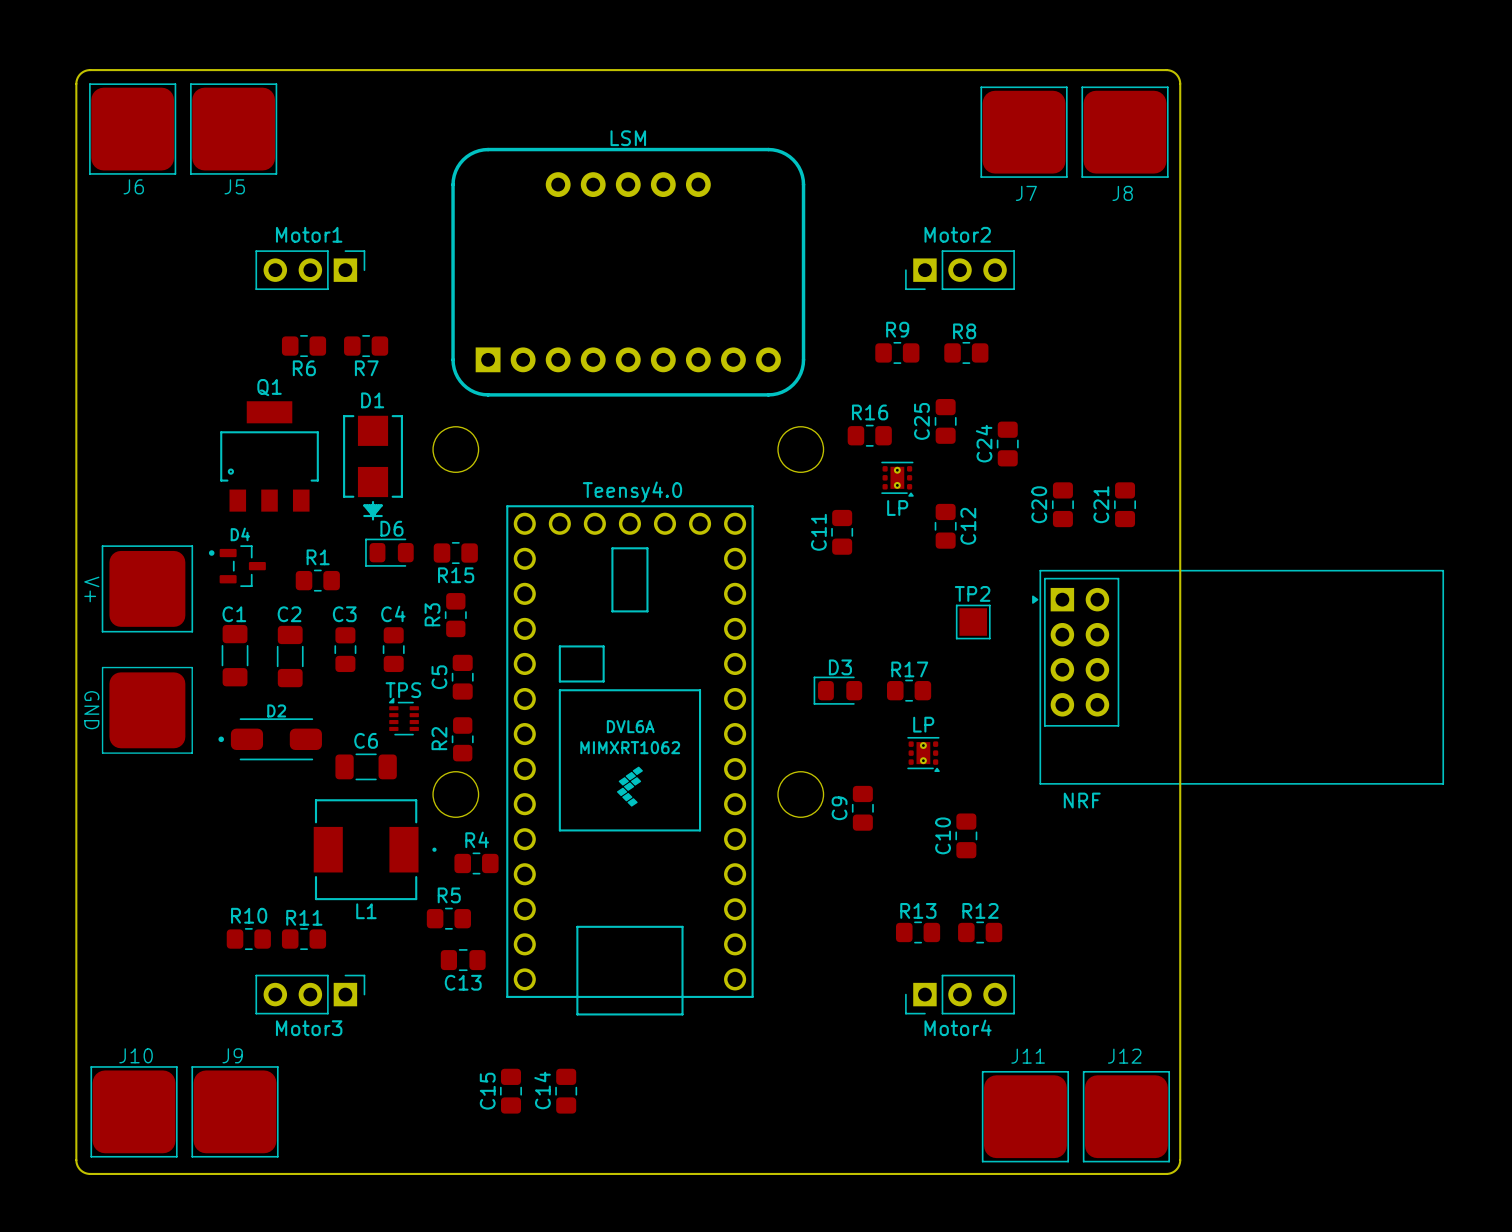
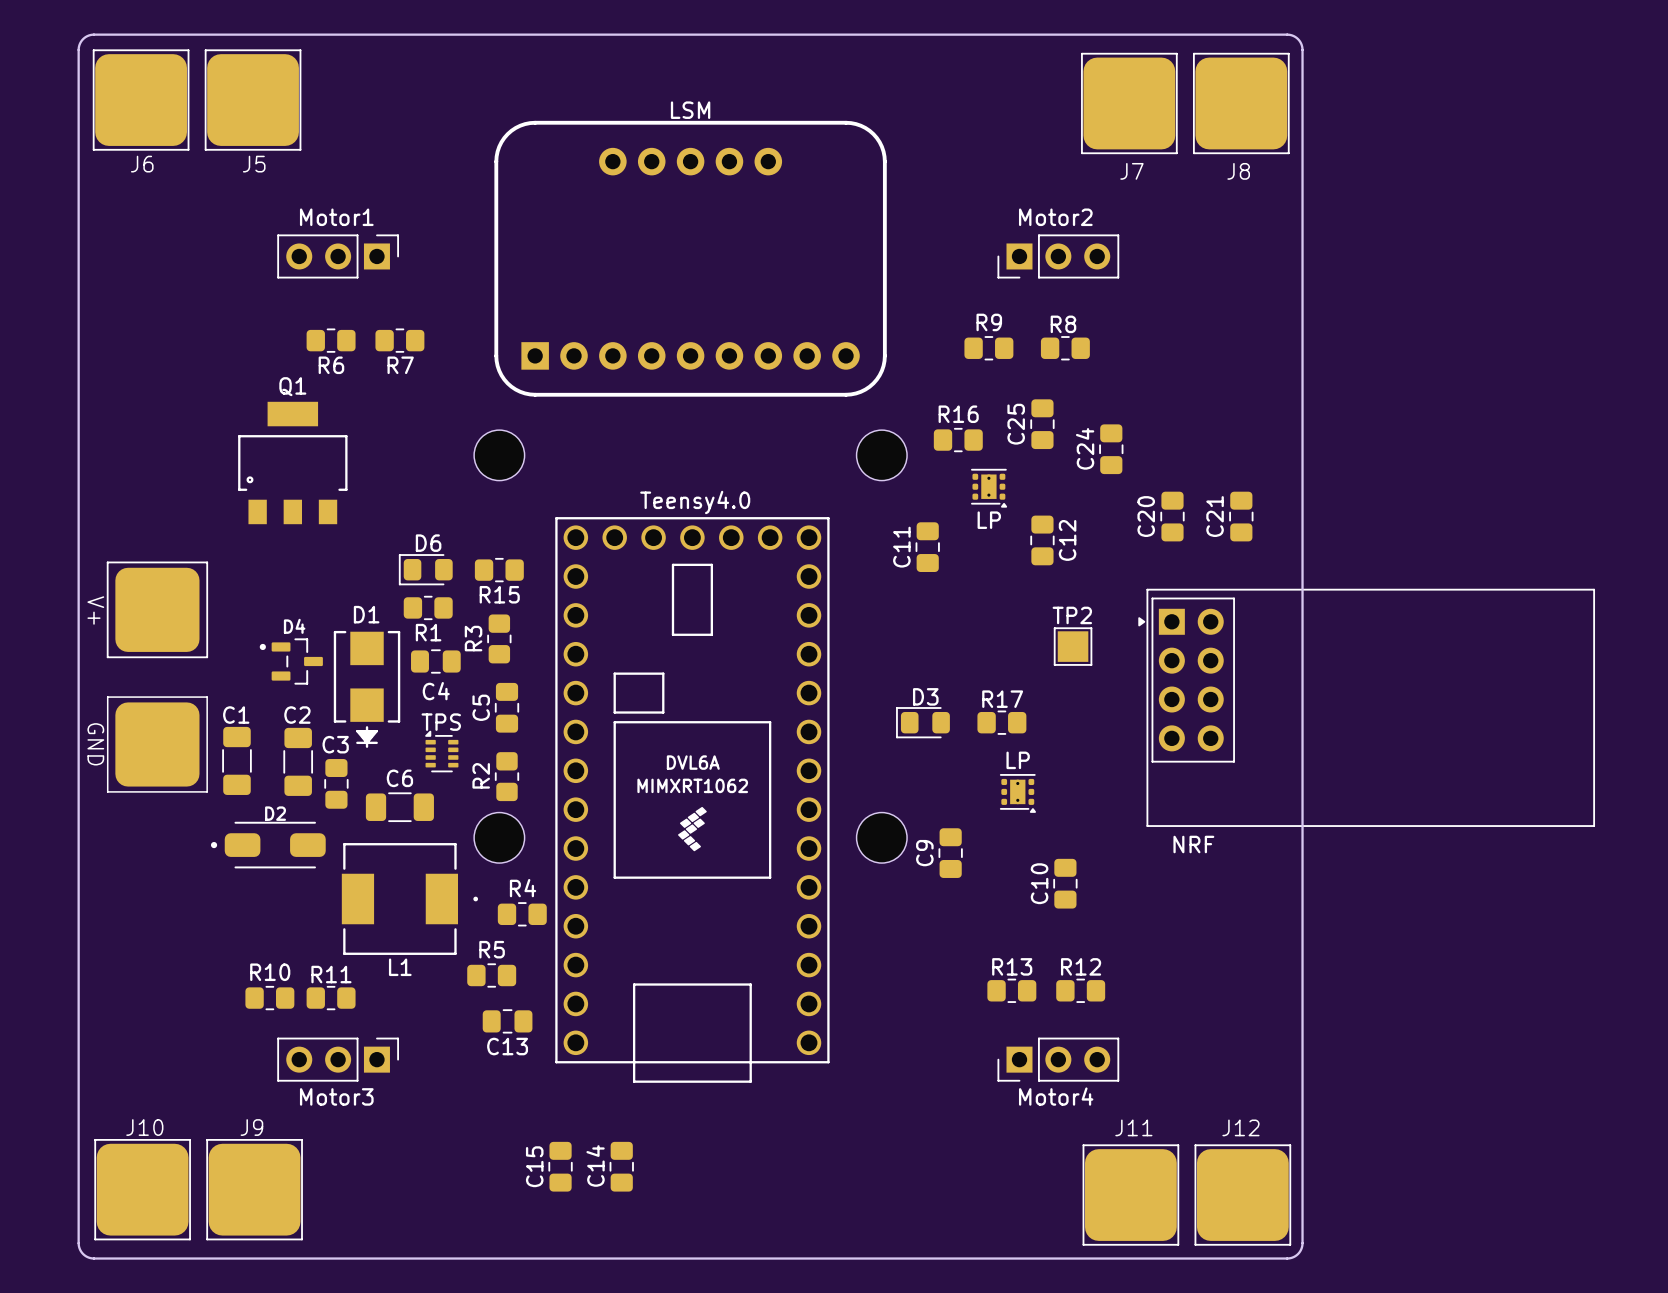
D1 position: (373, 467) -> (367, 689)
R1 name position: R1 (318, 557) -> R1 (428, 632)
D4 position: (237, 566) -> (291, 661)
R1 position: (317, 580) -> (428, 607)
C4 name position: C4 (393, 613) -> C4 (436, 691)
C3 position: (345, 649) -> (336, 783)
C4 rotation: 0° (393, 649) -> 90° clockwise (435, 661)
C1 position: (235, 655) -> (236, 760)
C2 position: (290, 656) -> (298, 761)
D2 position: (270, 739) -> (268, 845)

